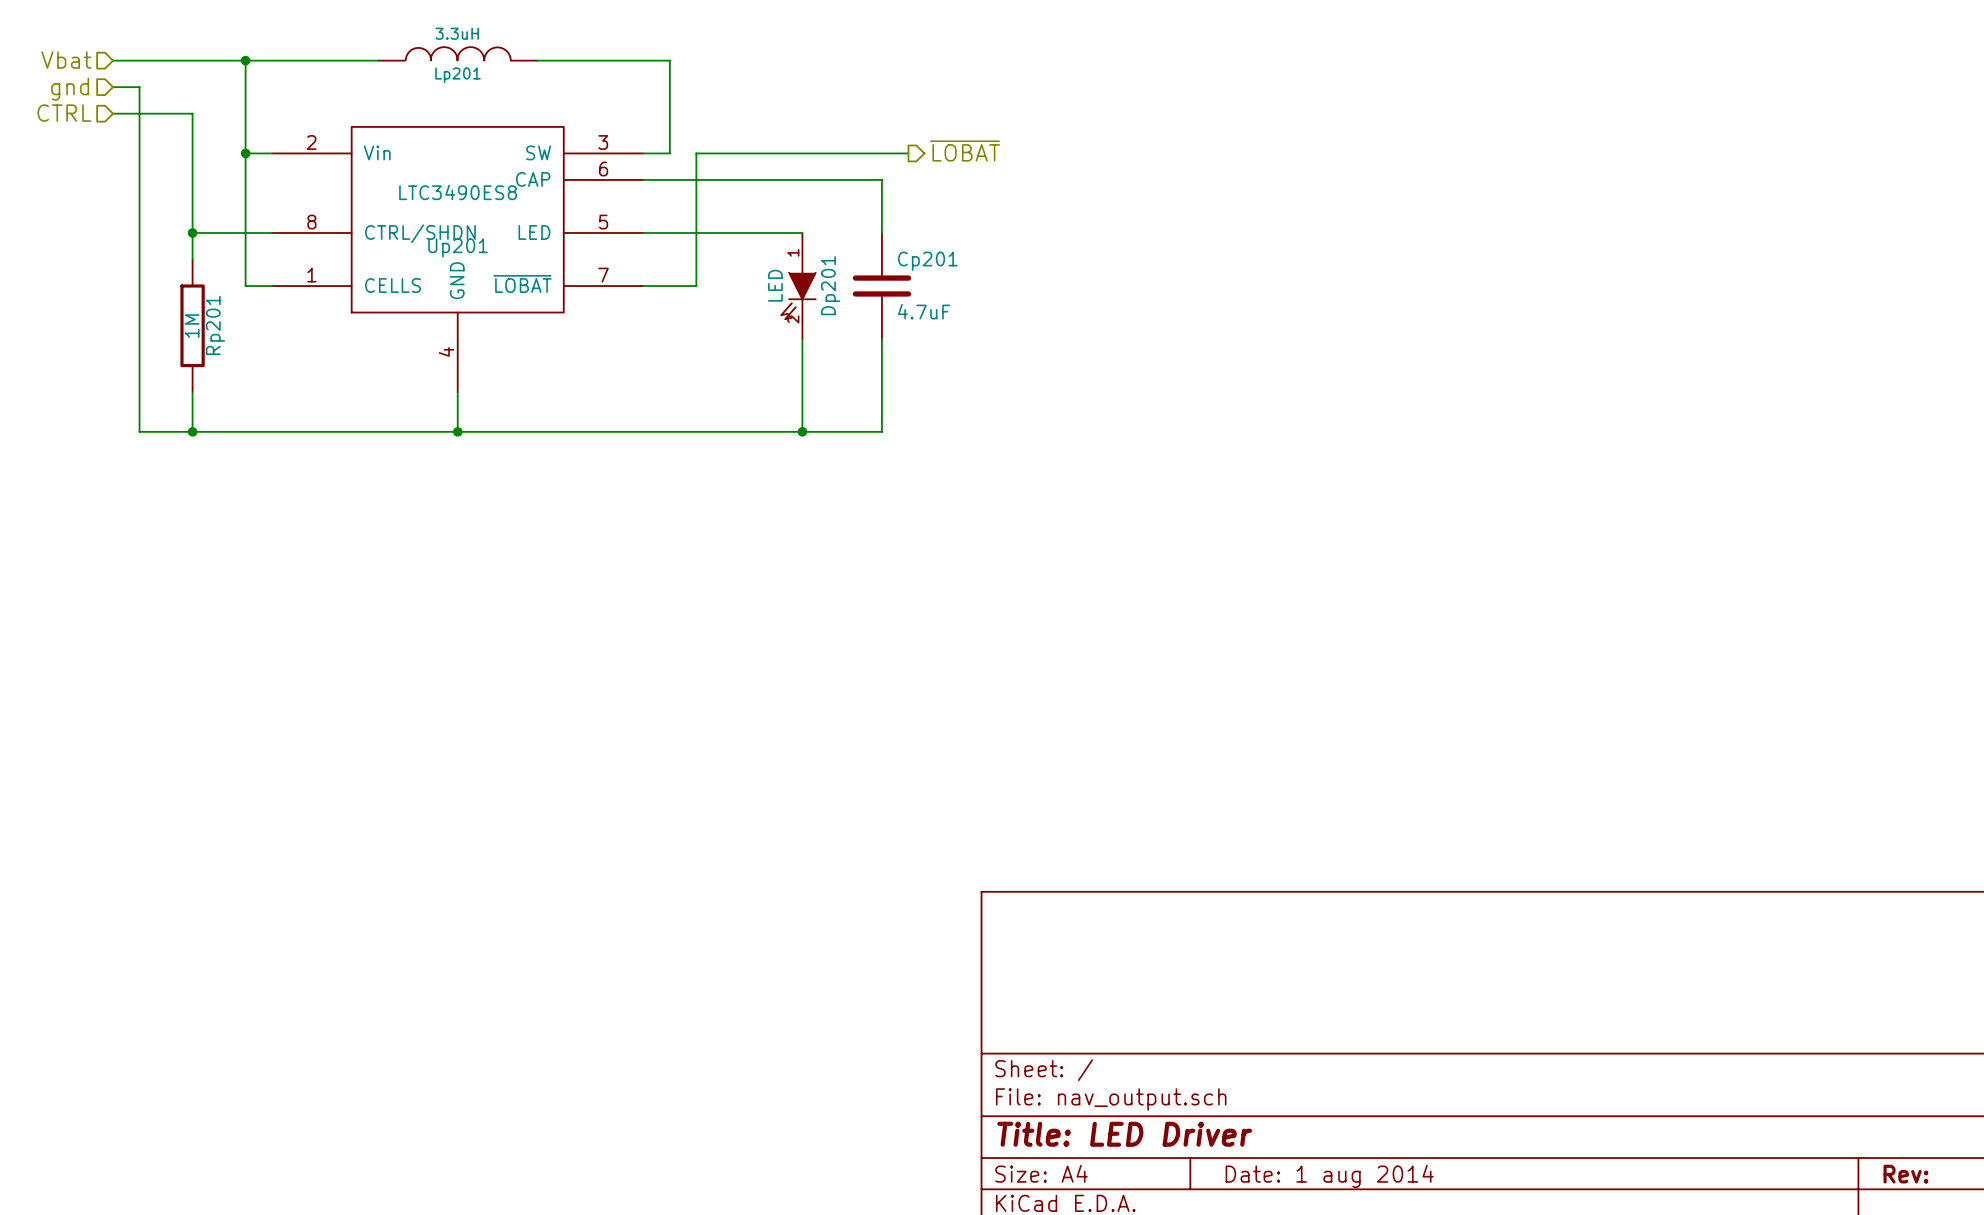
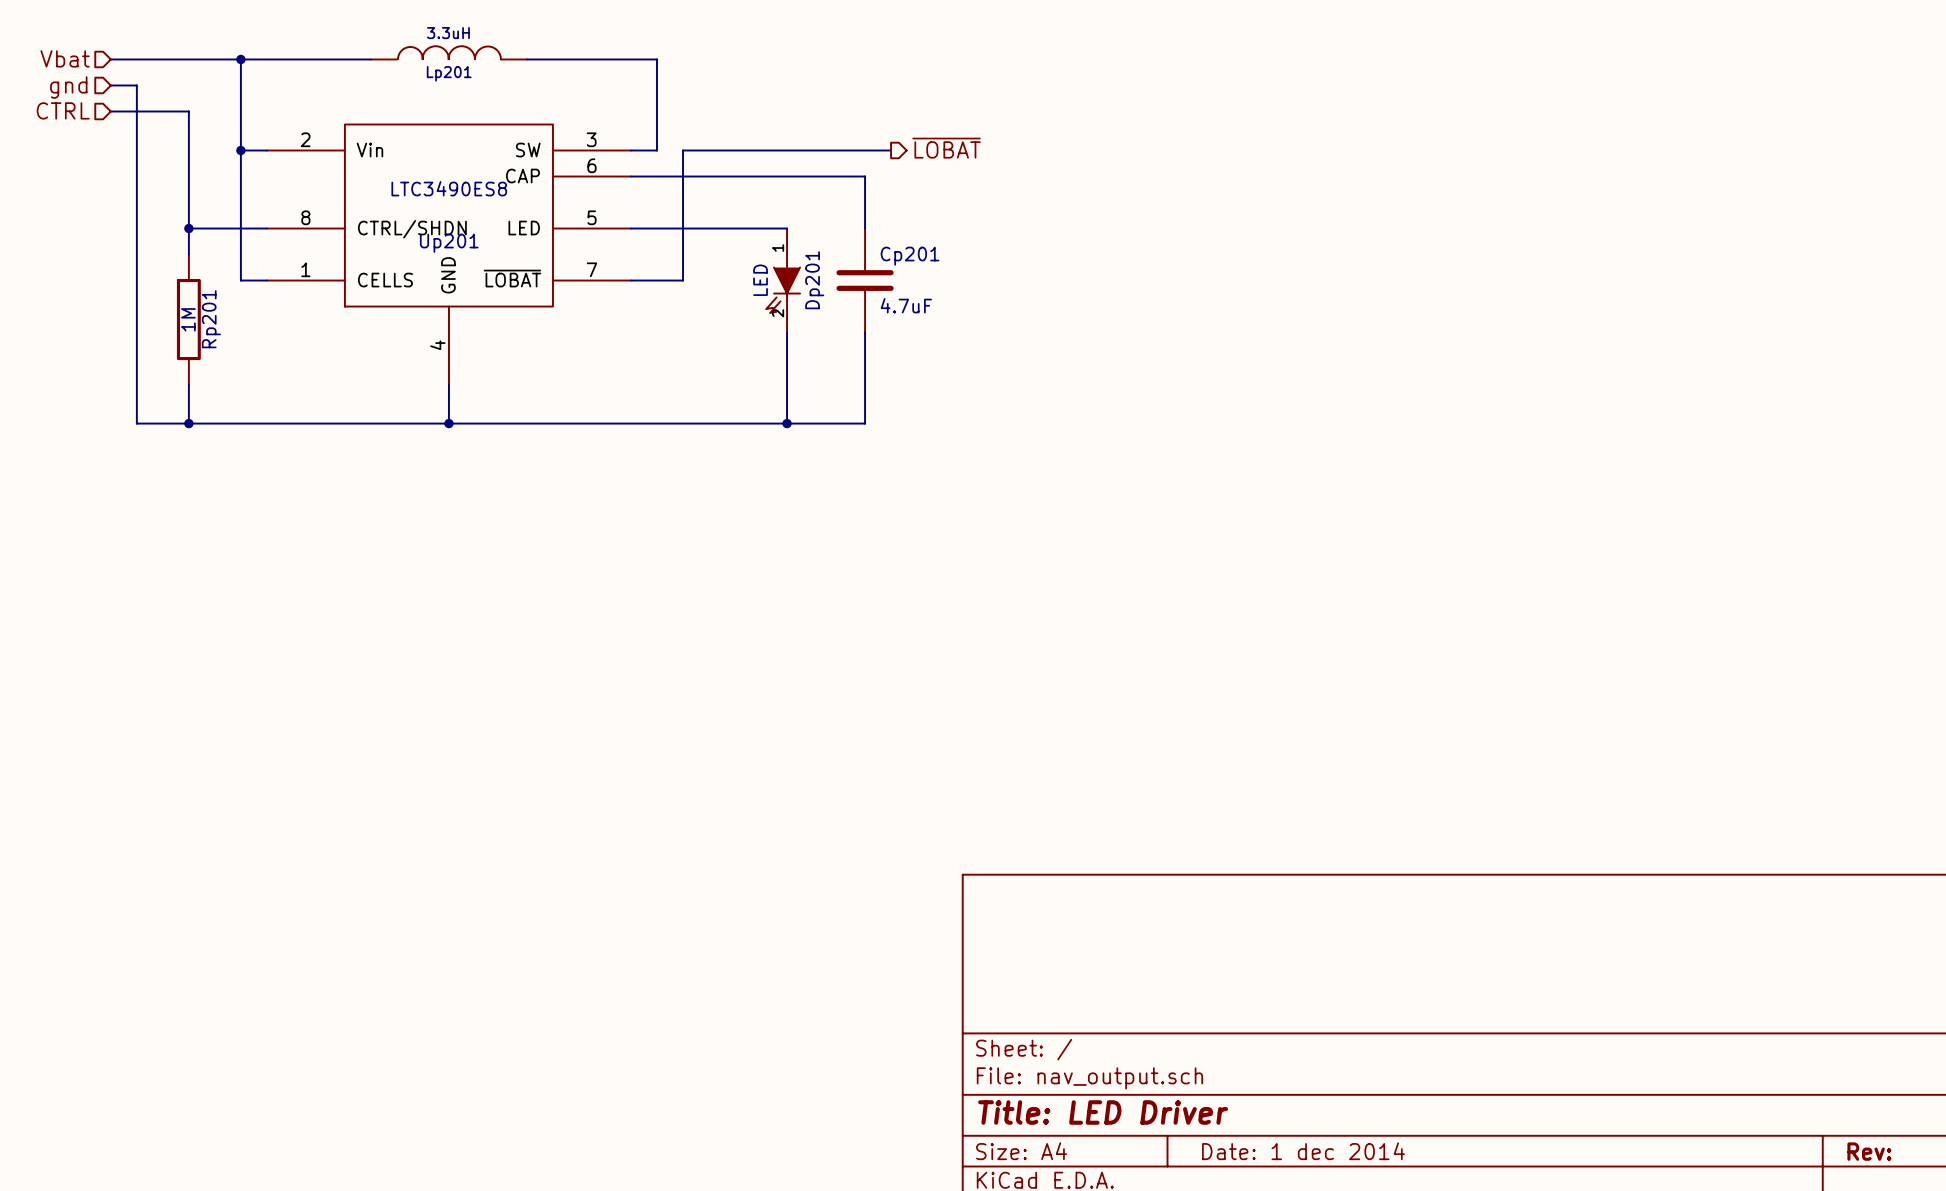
title block: Date: 1 aug 2014 (1329, 1176) -> Date: 1 dec 2014 (1303, 1151)

